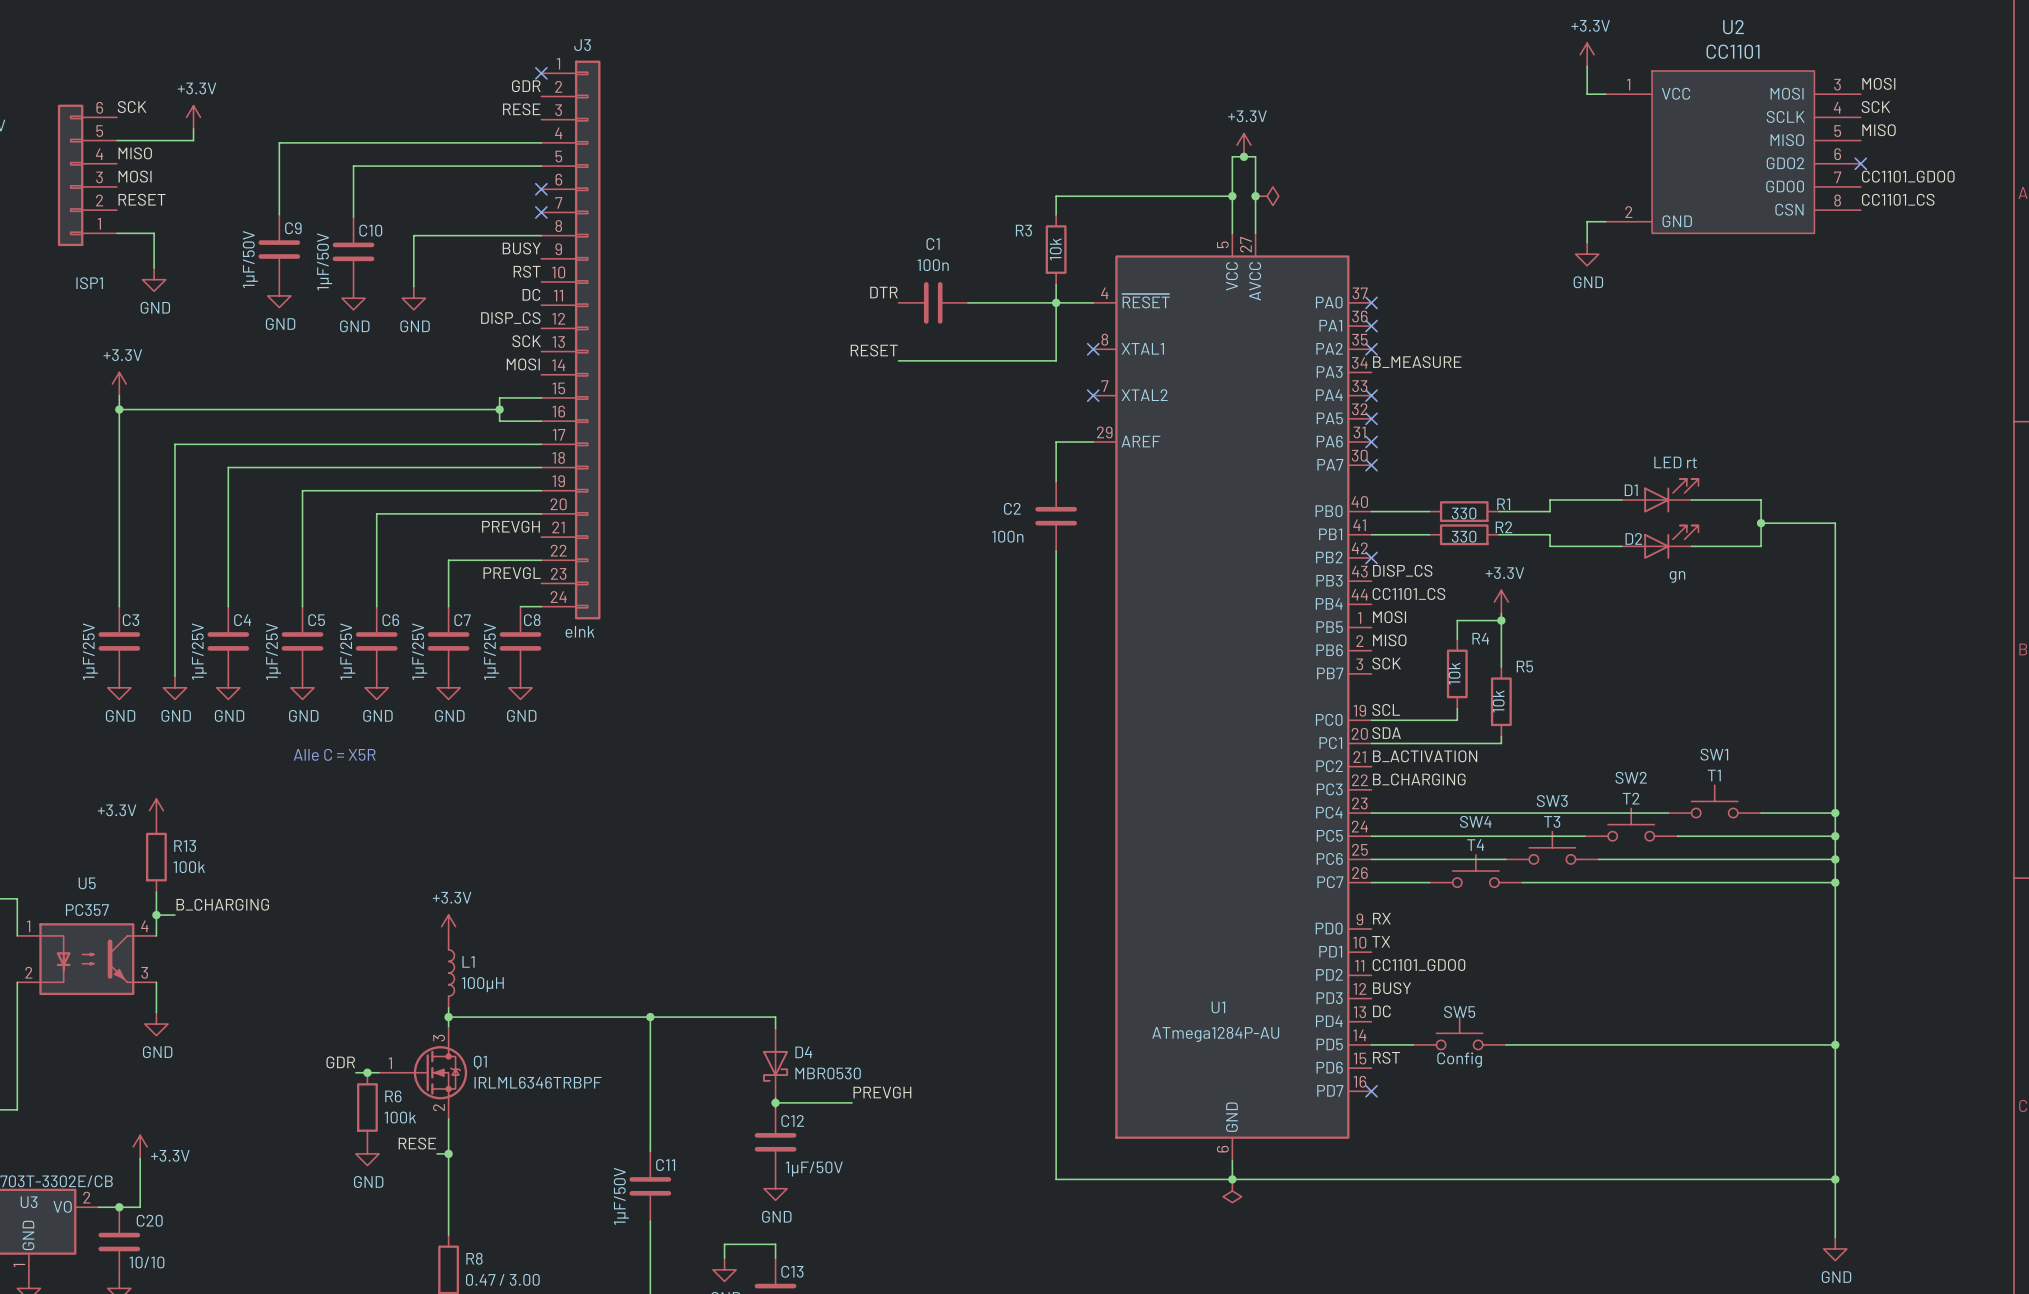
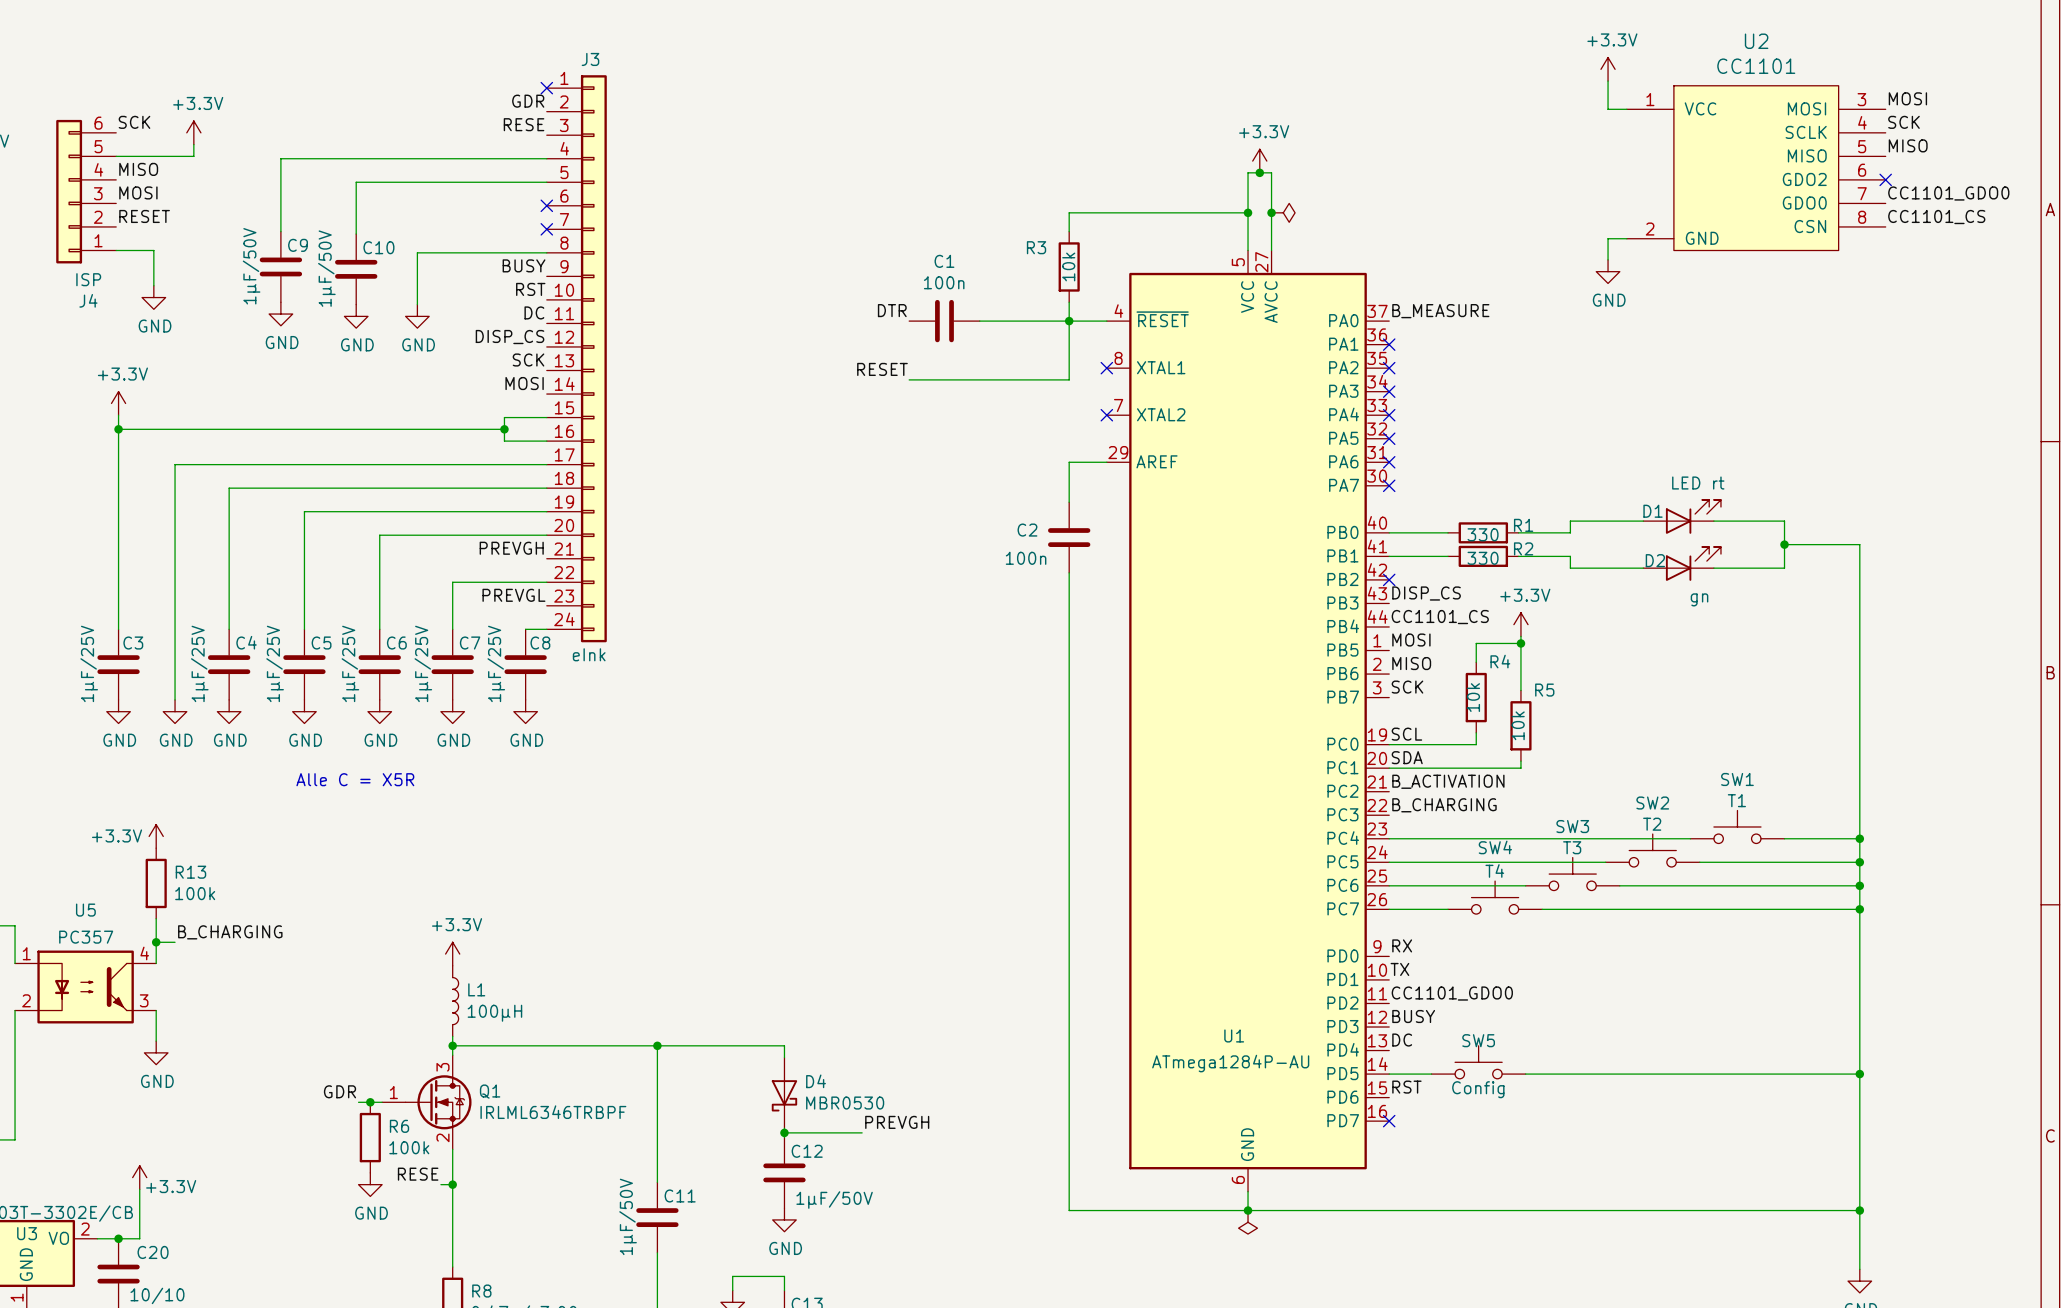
ISP1 value: none -> ISP (88, 279)
ISP1 name: ISP1 (89, 283) -> J4 (88, 300)
no-connect mark: (1371, 302) -> none
label position: B_MEASURE (1417, 362) -> B_MEASURE (1440, 311)
no-connect mark: none -> (1389, 391)

